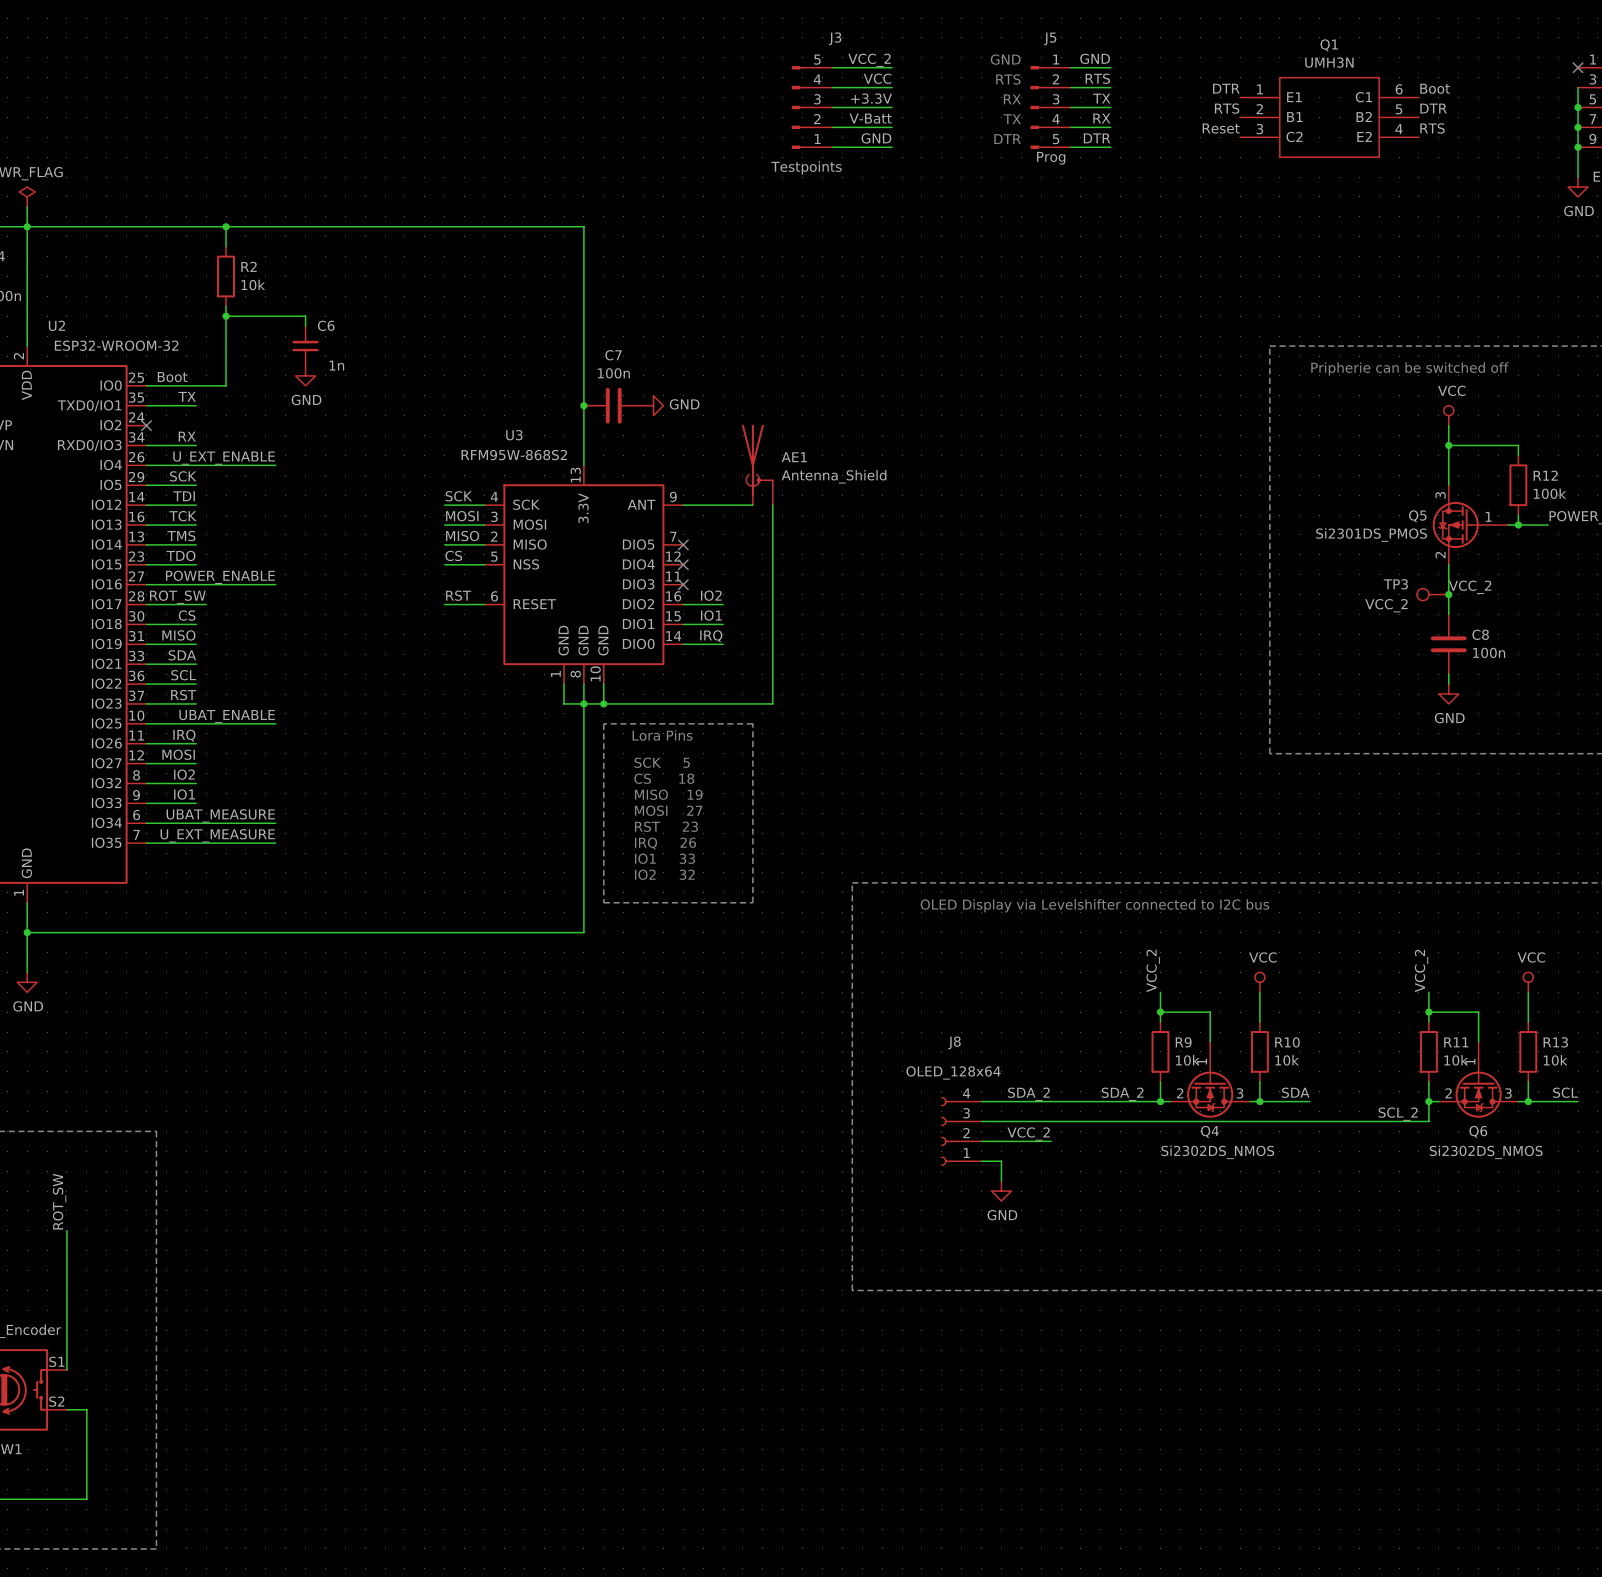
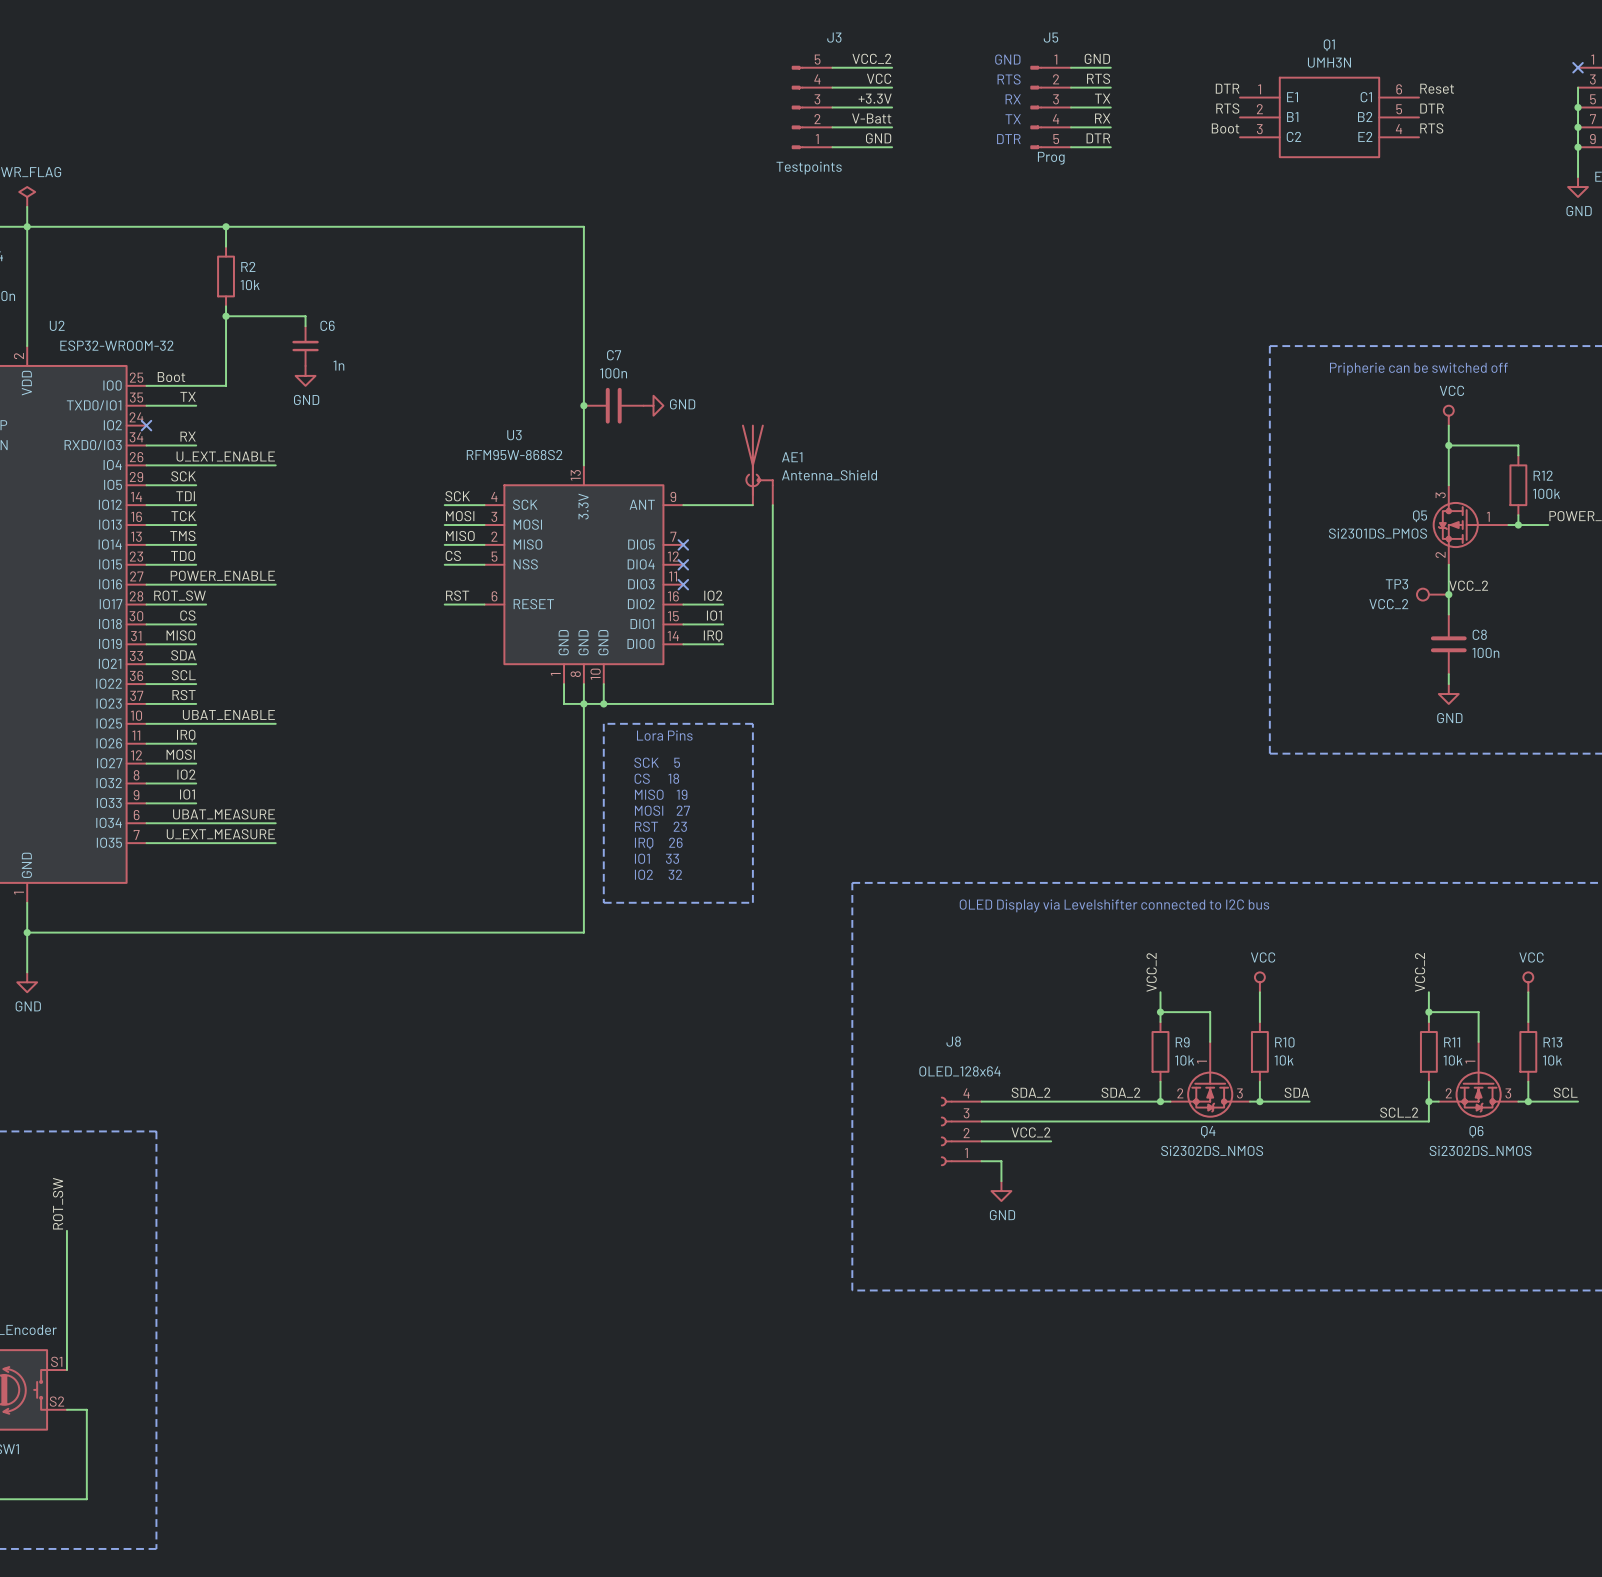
label: Boot (1435, 88) -> Reset (1437, 88)
label: Reset (1221, 128) -> Boot (1225, 128)

